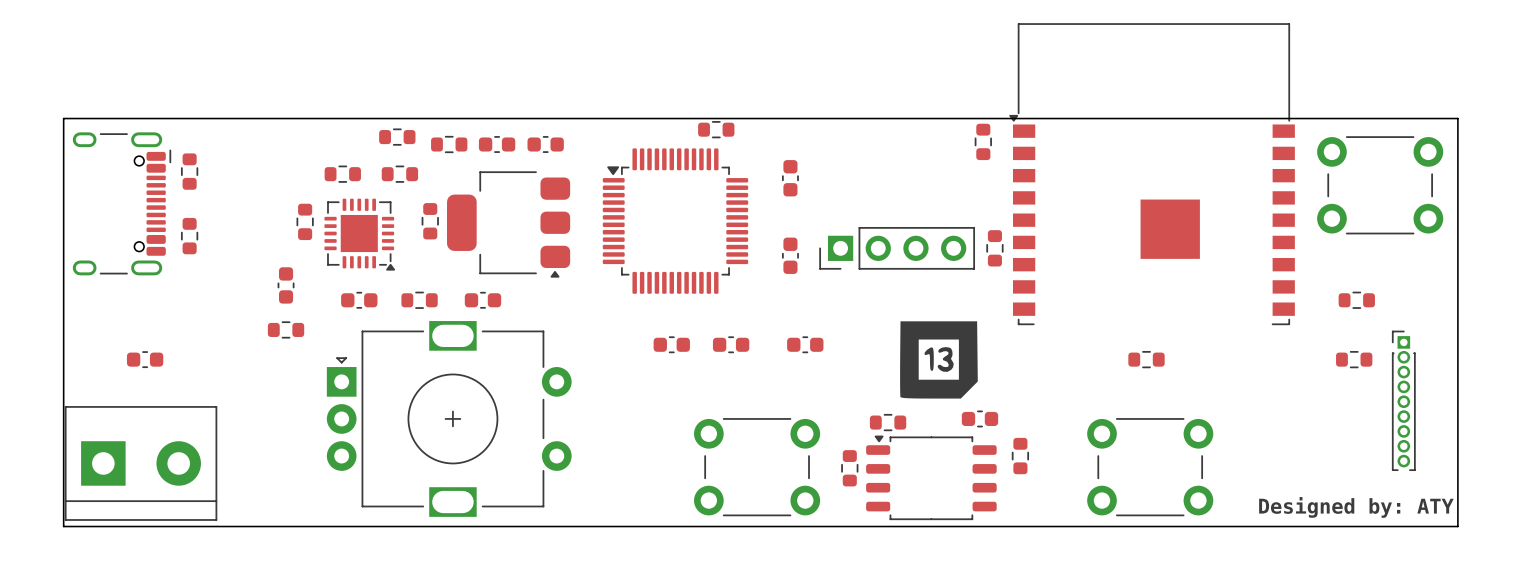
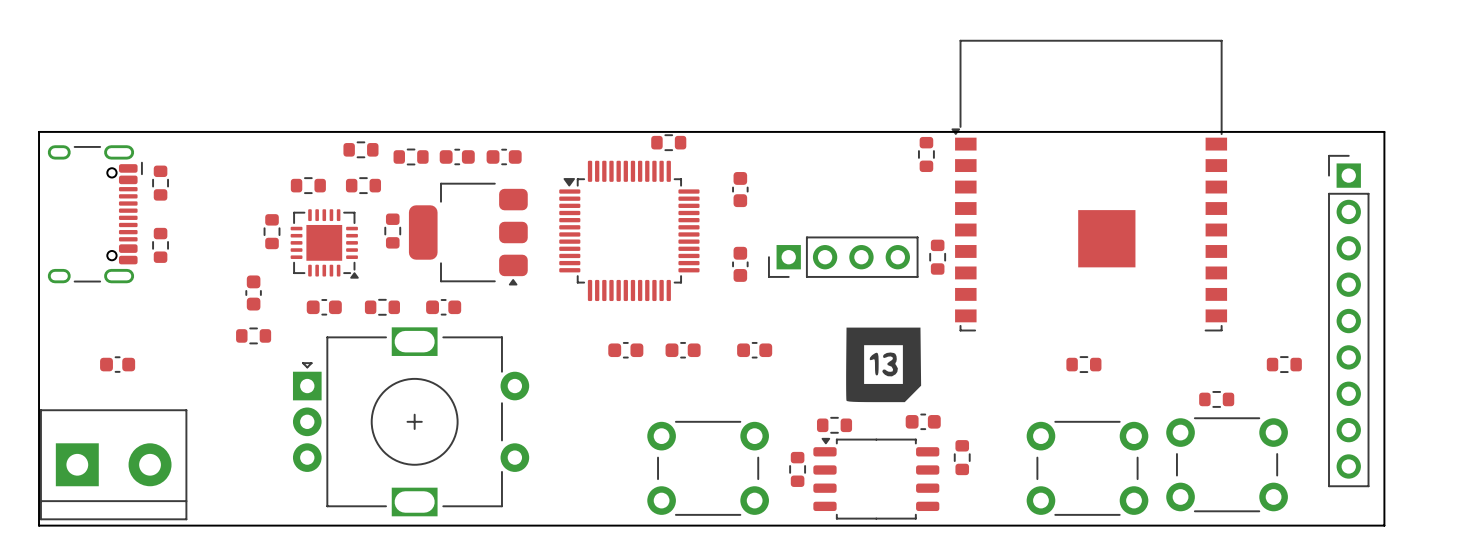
part position: (1380, 185) -> (1227, 464)
part position: (1356, 300) -> (1216, 399)
part: none -> (1348, 321)
part: (1403, 400) -> none
text: Designed by: ATY (1356, 507) -> none

